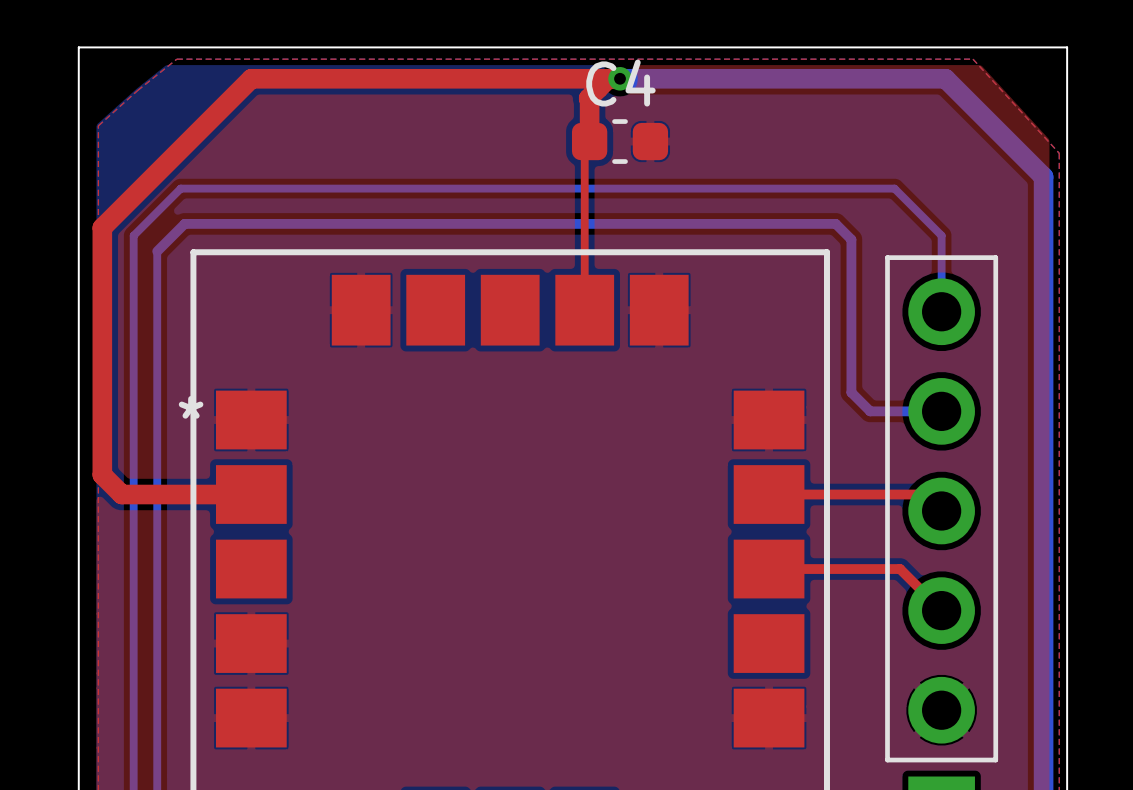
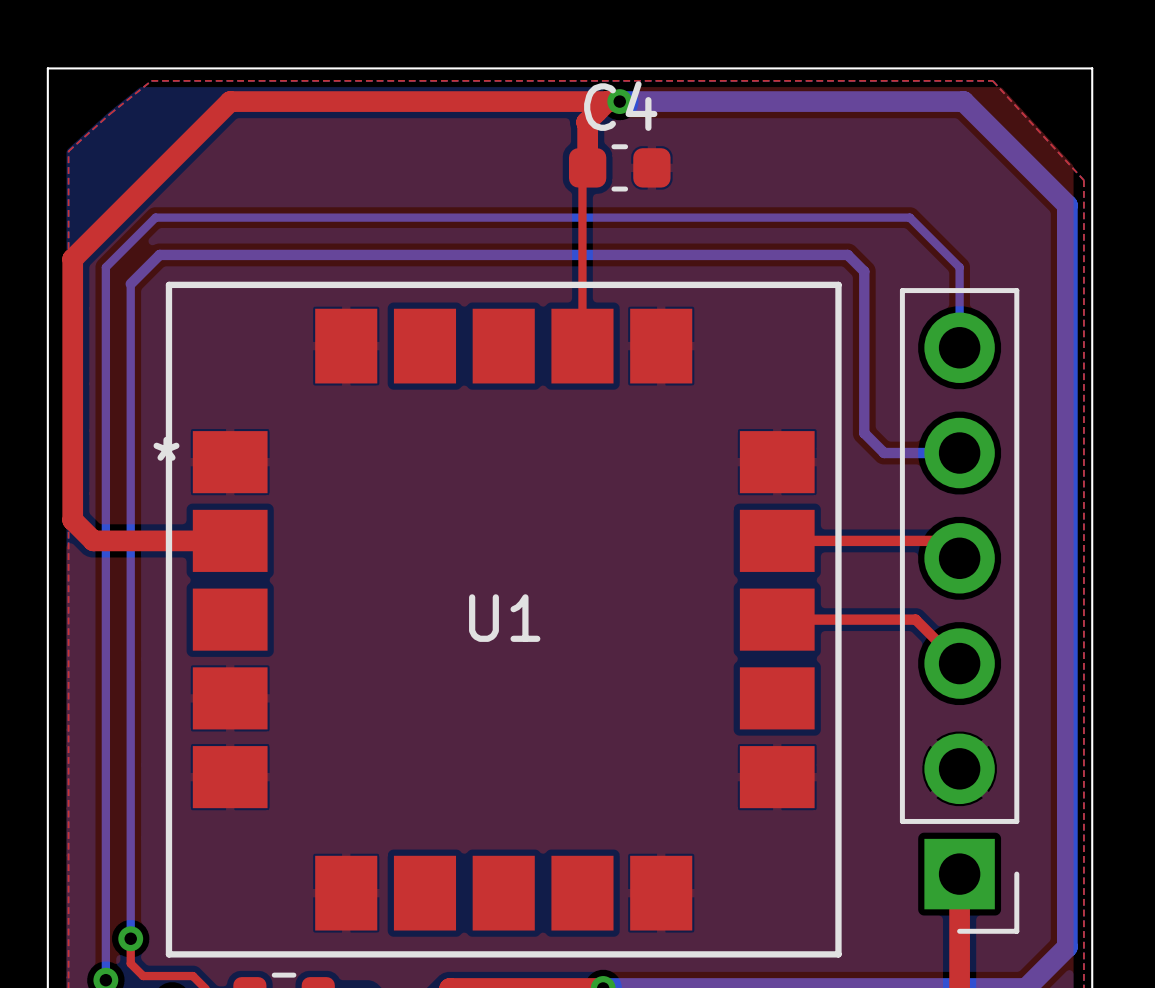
U1 name: none -> U1 (504, 618)

